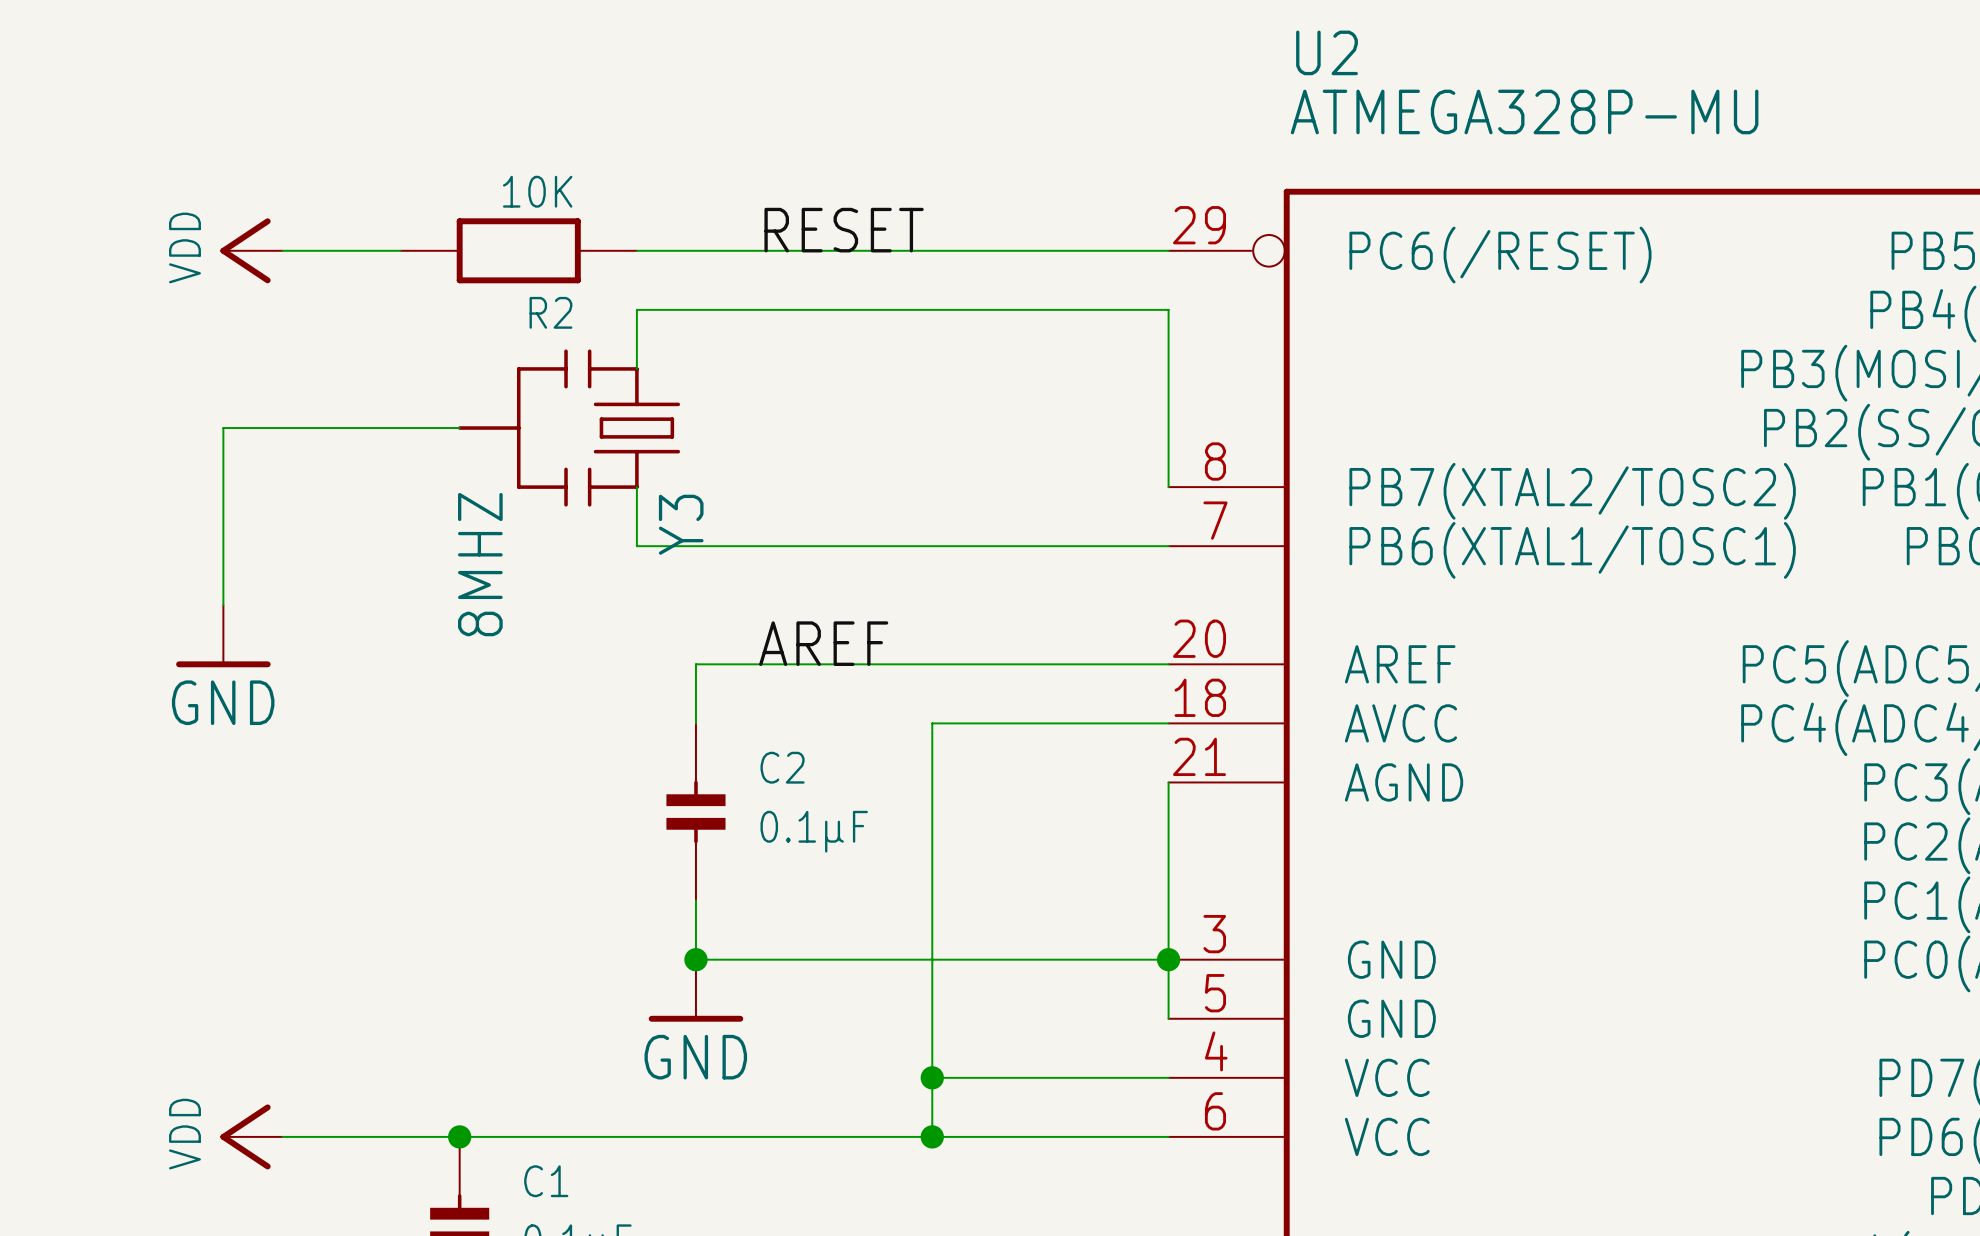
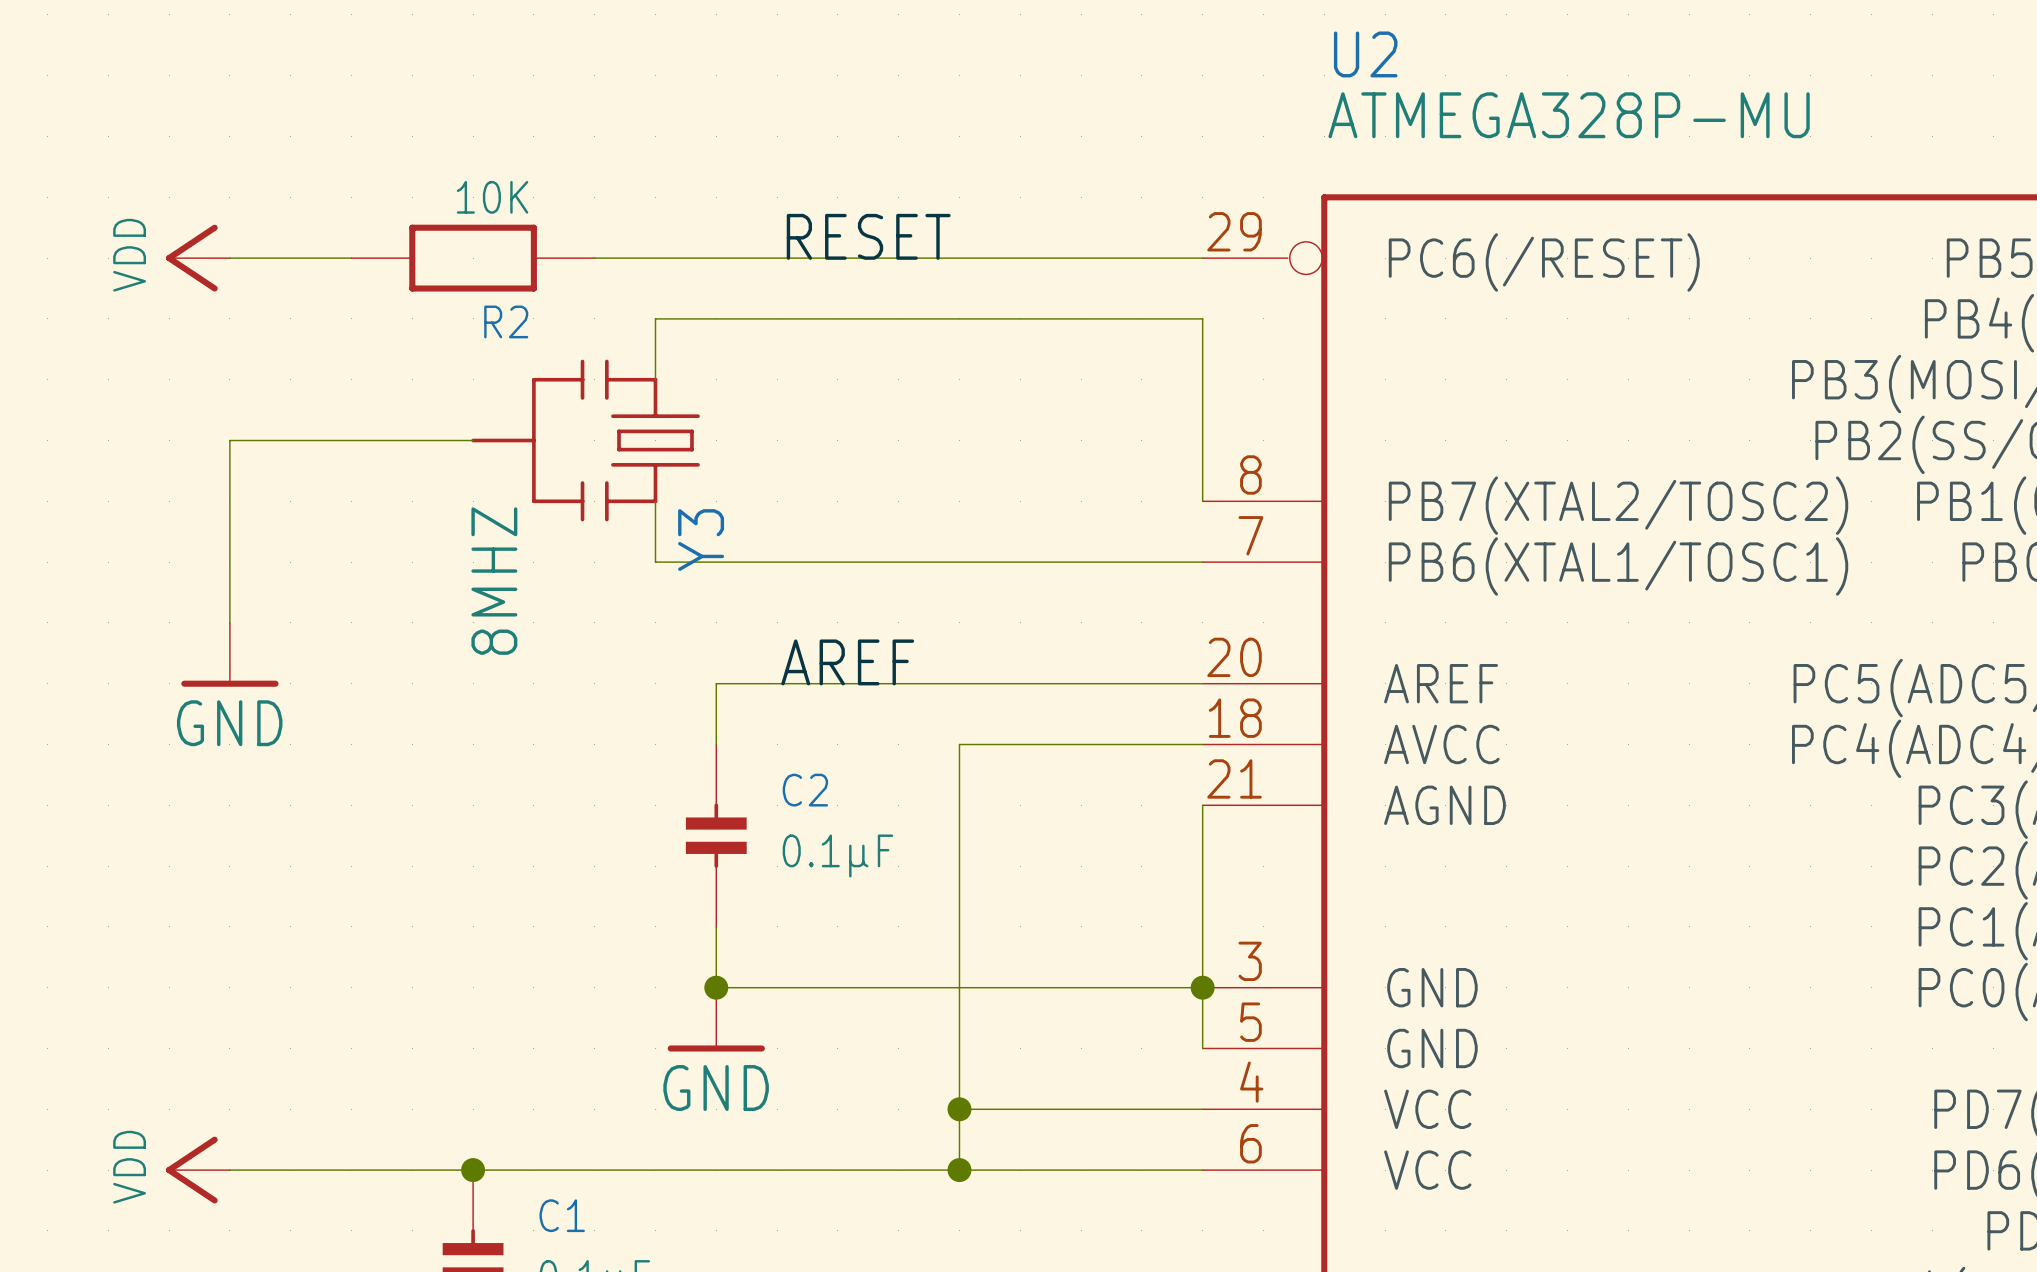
power symbol position: VDD (251, 250) -> VDD (197, 258)
R2 position: (518, 250) -> (473, 258)
power symbol position: VDD (251, 1136) -> VDD (197, 1170)

